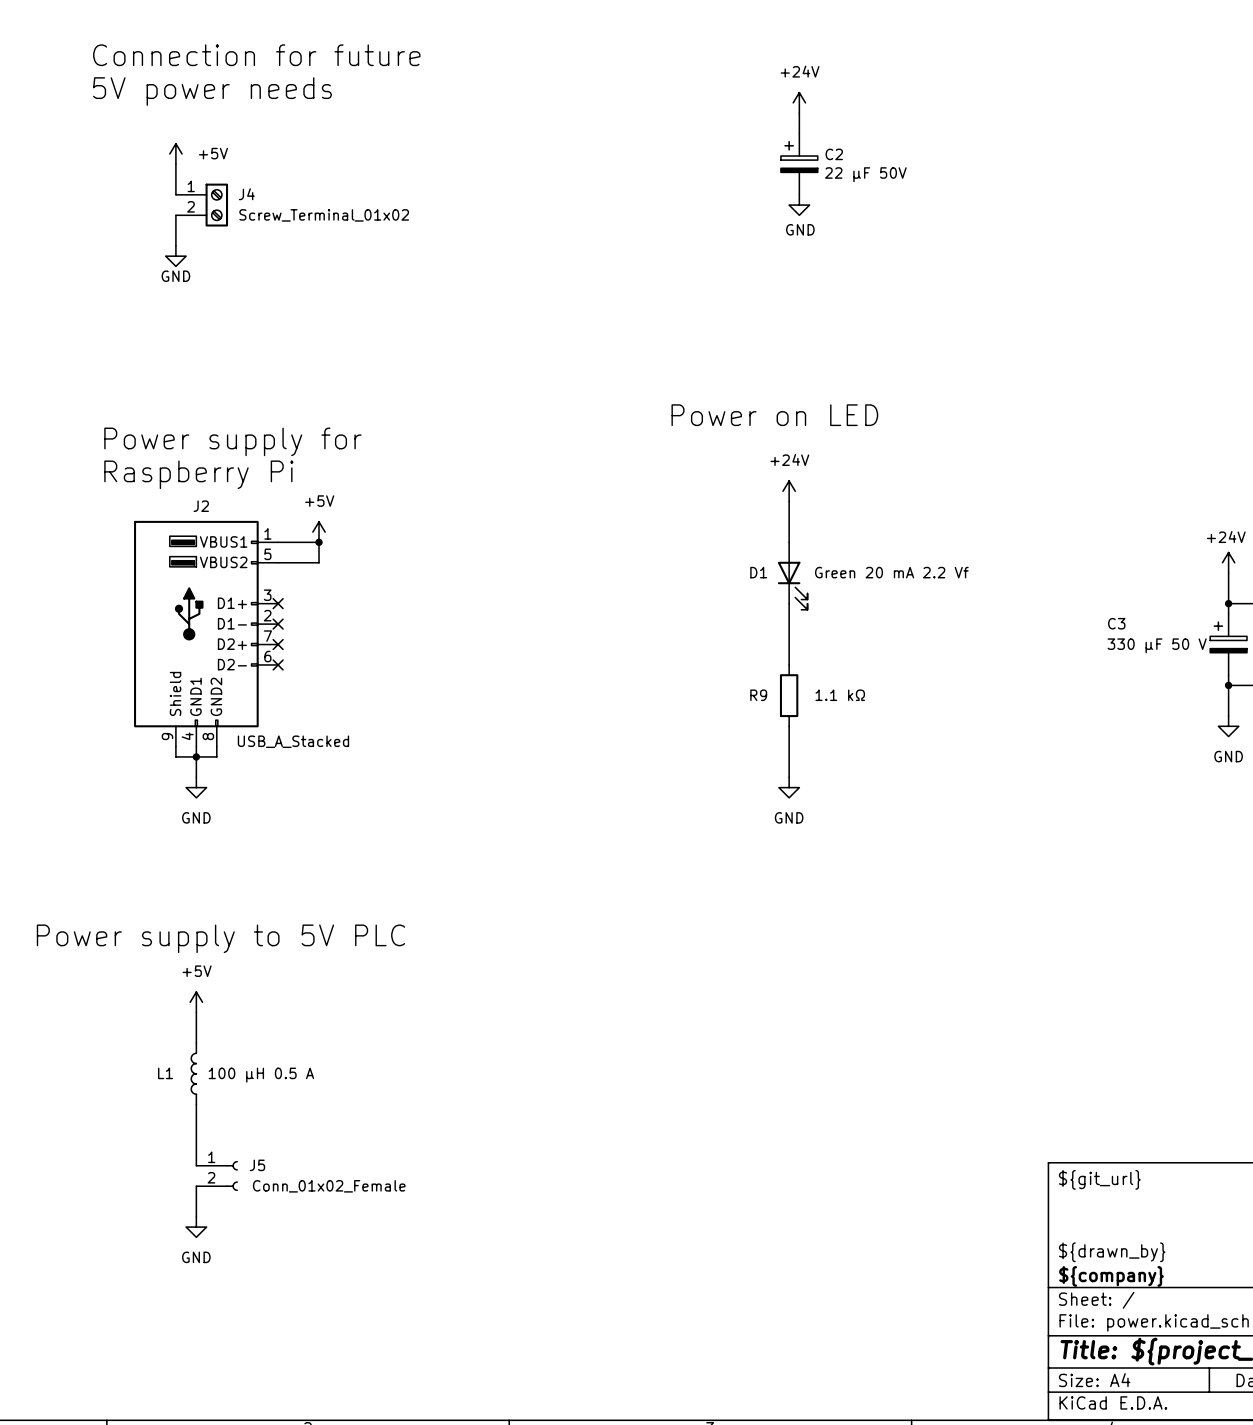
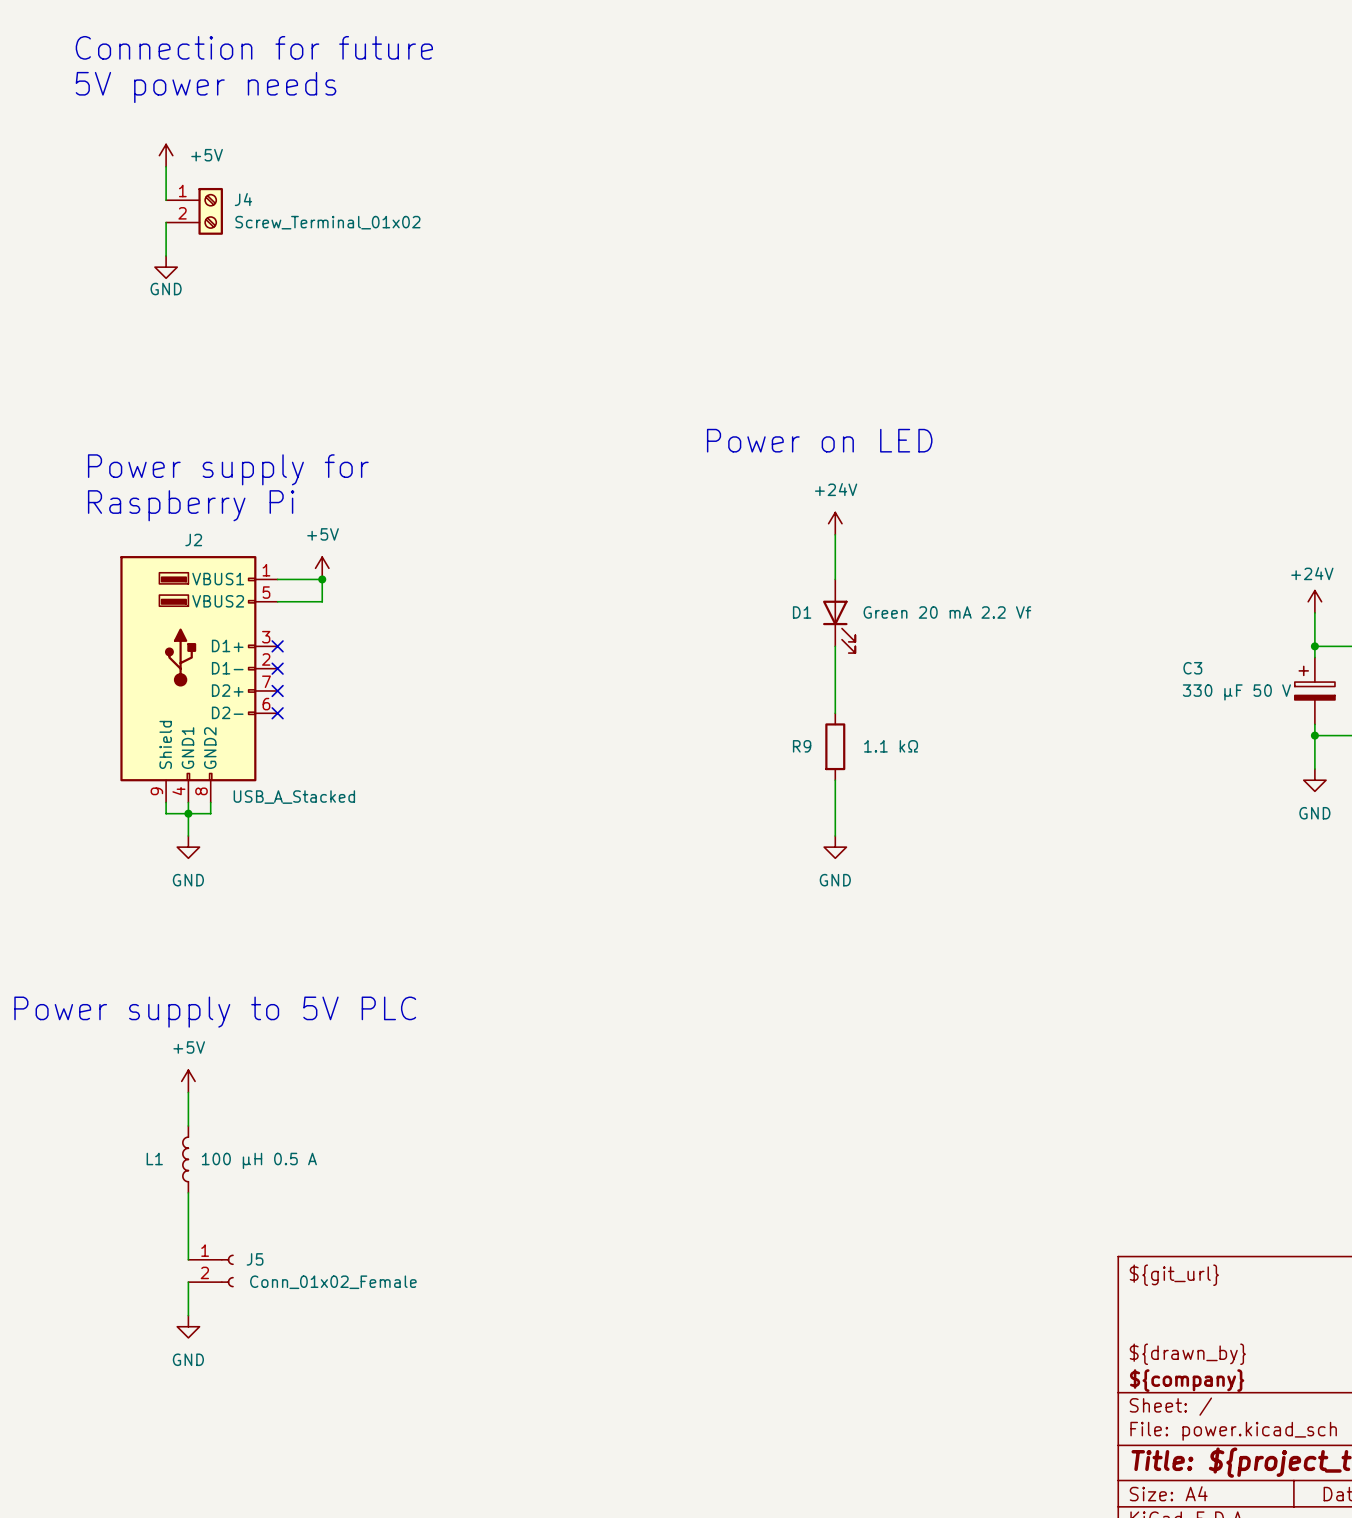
power symbol: +24V (799, 102) -> none
wire: (799, 113) (799, 133) -> none
C2: 22 µF 50V (799, 164) -> none
power symbol: GND (799, 205) -> none

